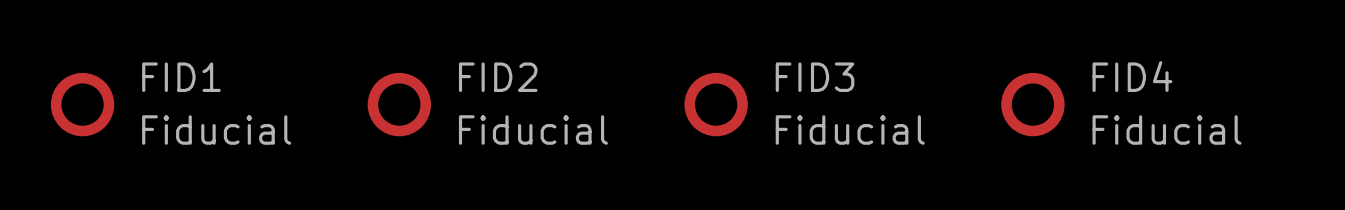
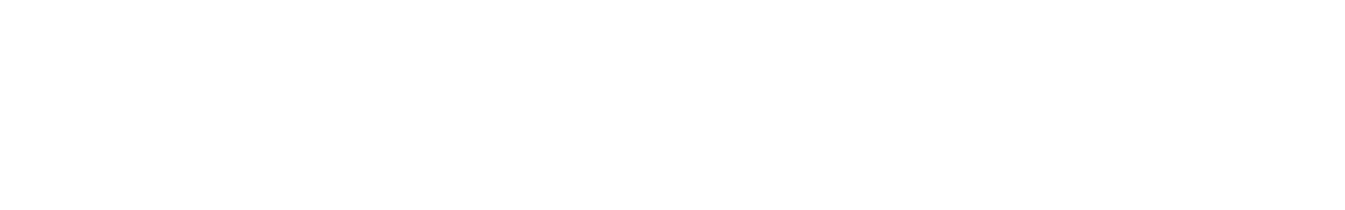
FID1: Fiducial (82, 104) -> none
FID2: Fiducial (399, 104) -> none
FID3: Fiducial (716, 104) -> none
FID4: Fiducial (1032, 104) -> none

